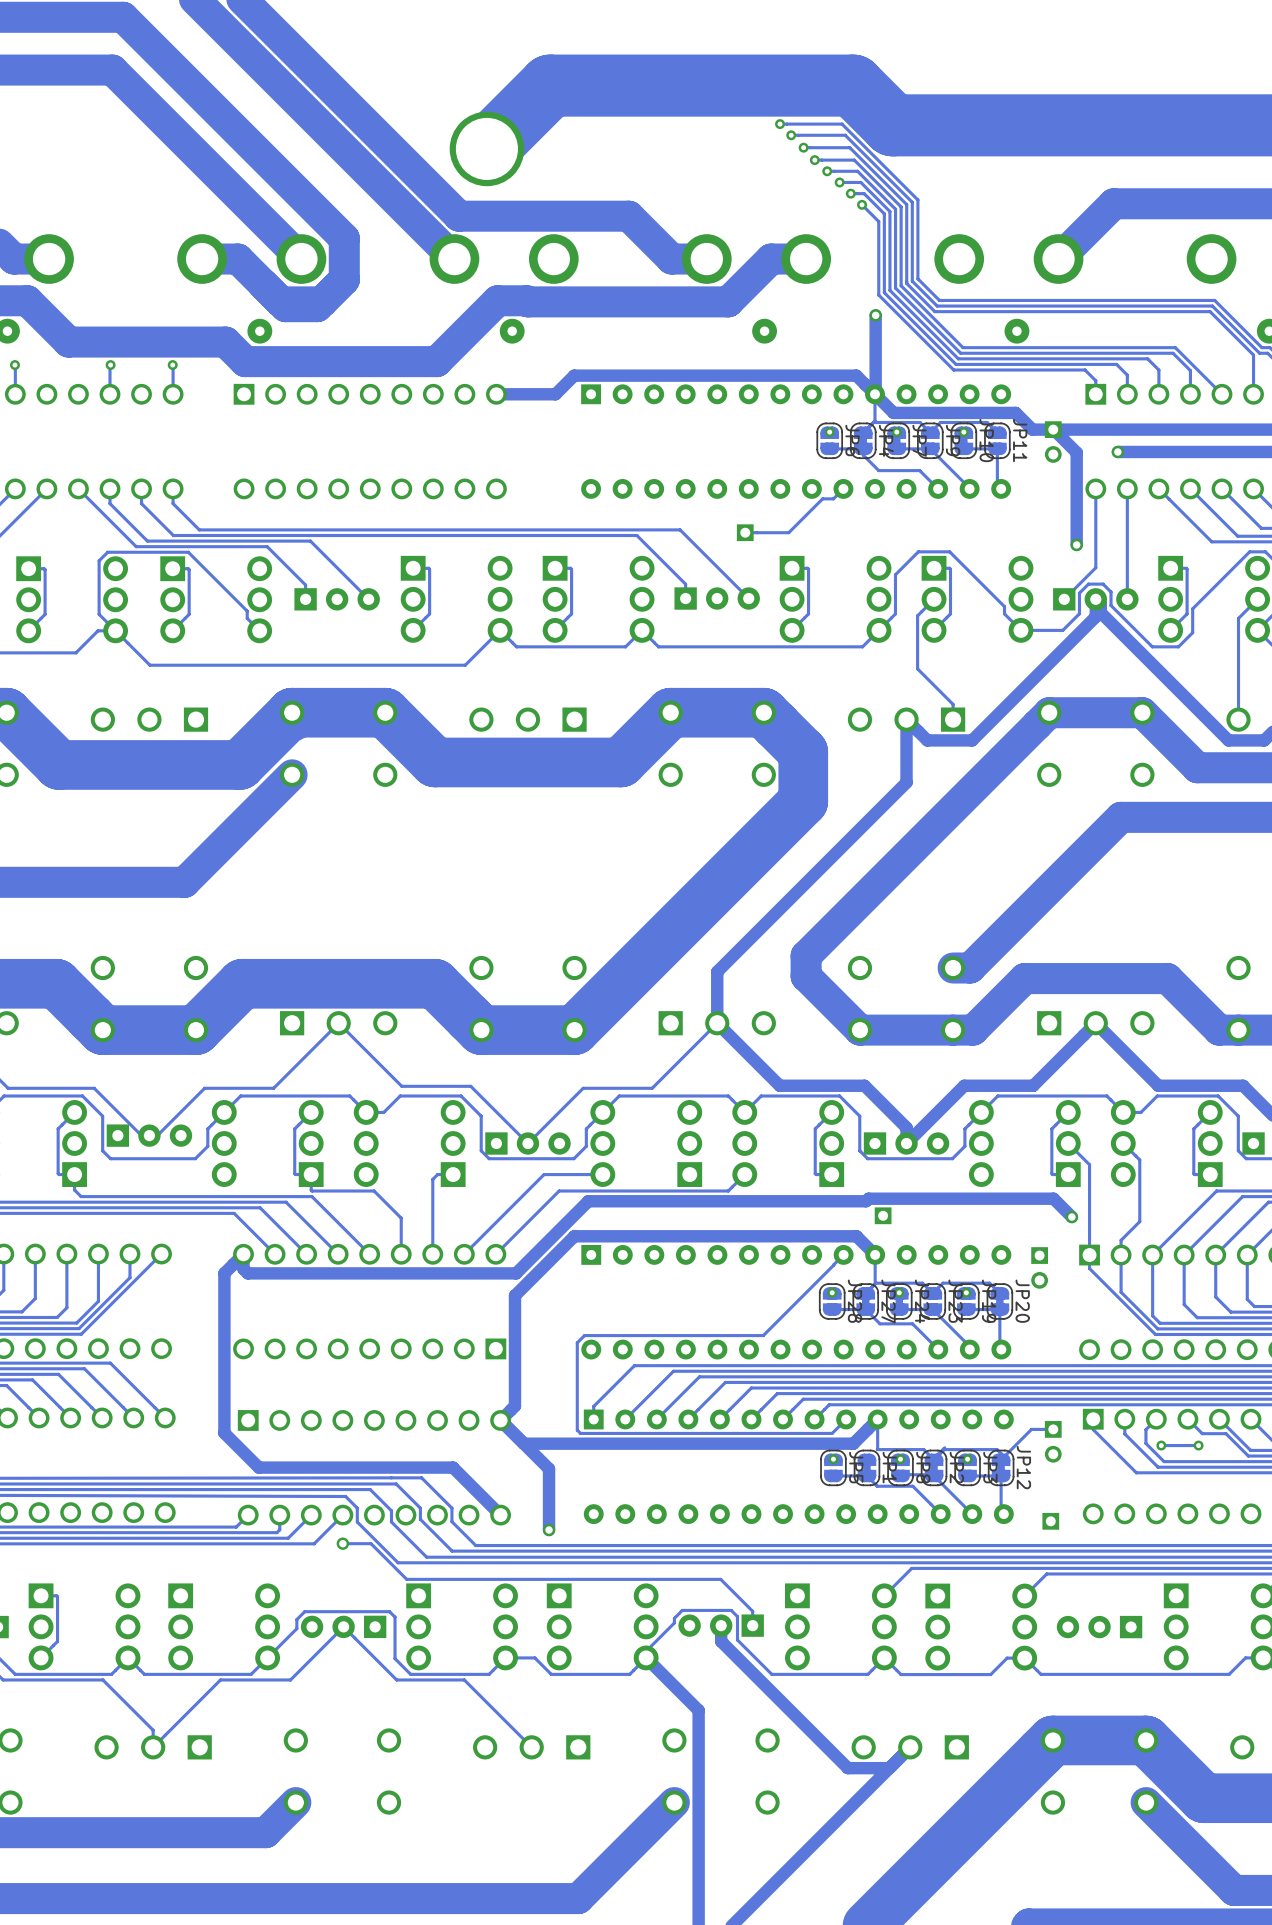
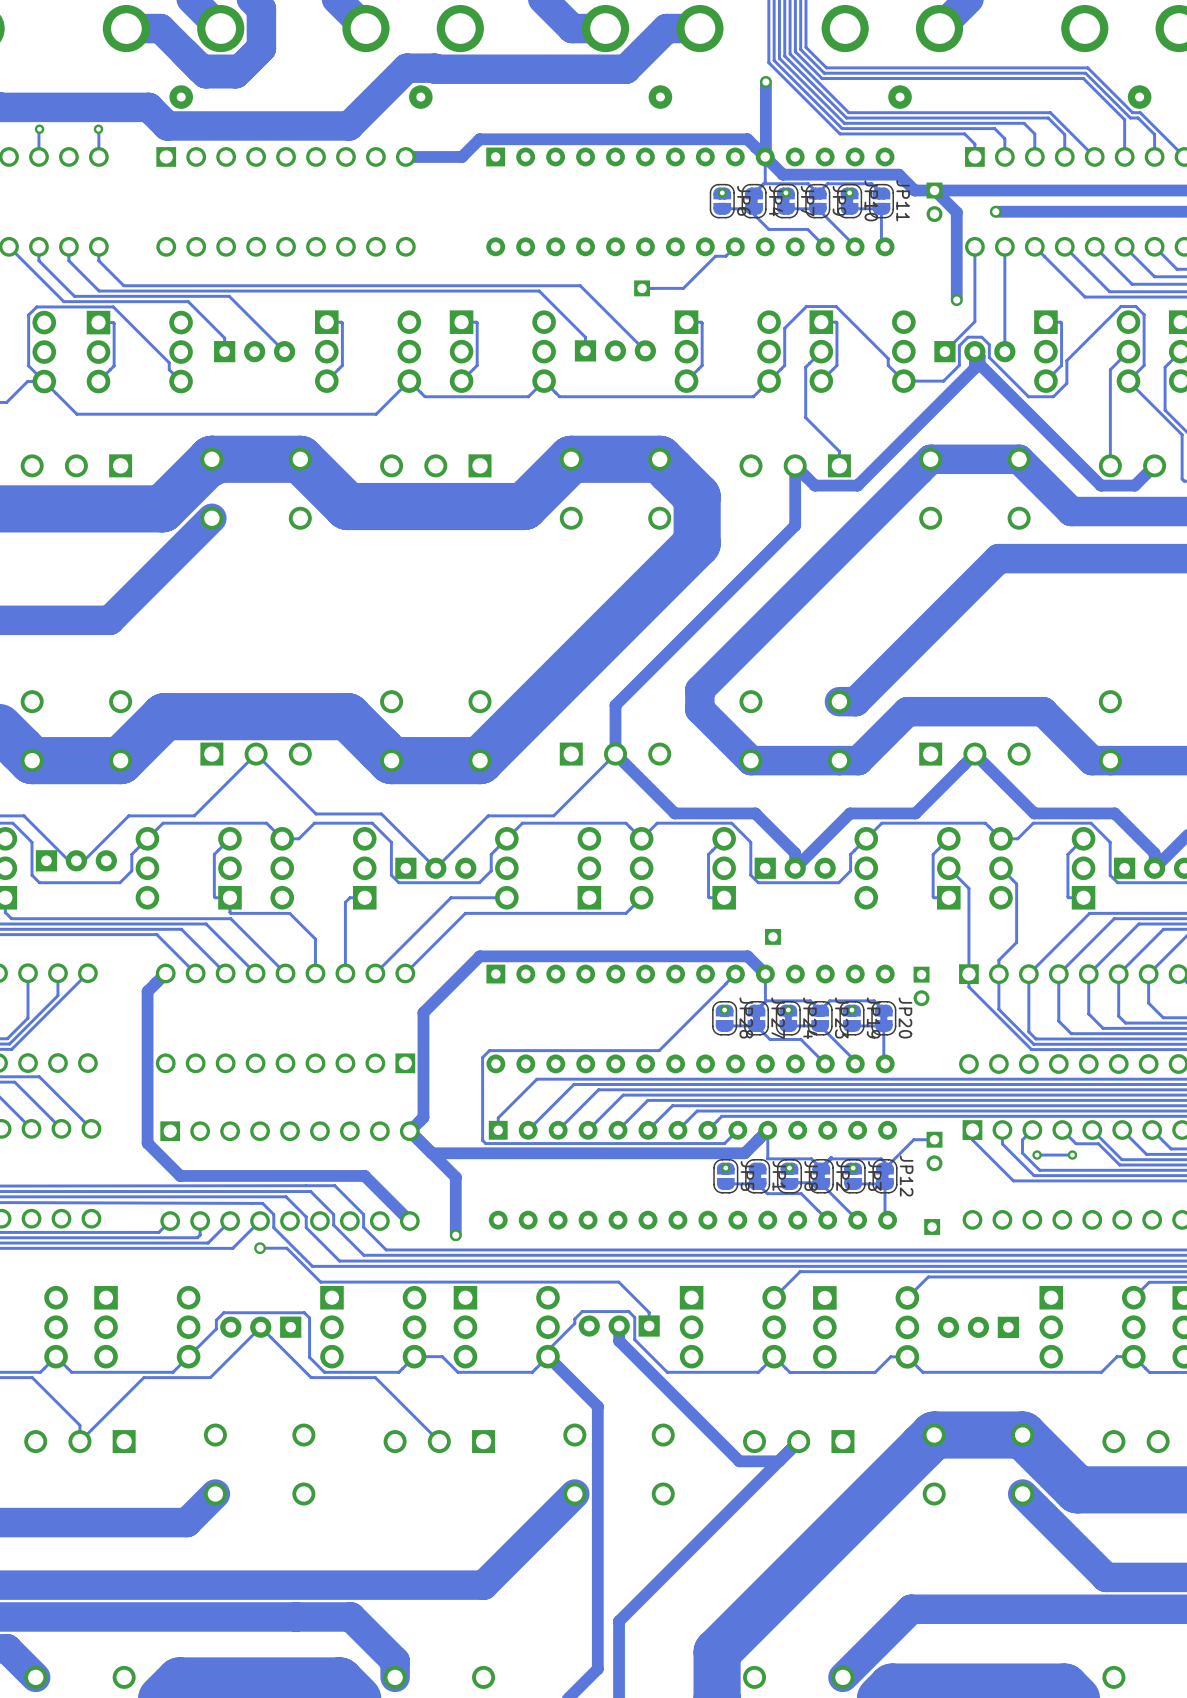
track: (1071, 1217) (1053, 1198) (868, 1198) (866, 1201) (588, 1201) (516, 1273) (247, 1273) (243, 1269) (243, 1254) -> none
via: (1071, 1217) -> none

